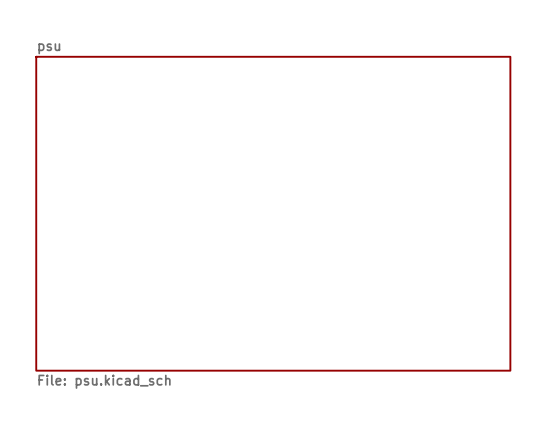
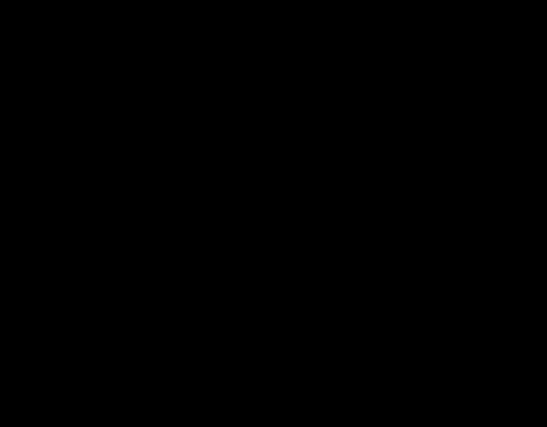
sheet psu: File: psu.kicad_sch (273, 213) -> none

